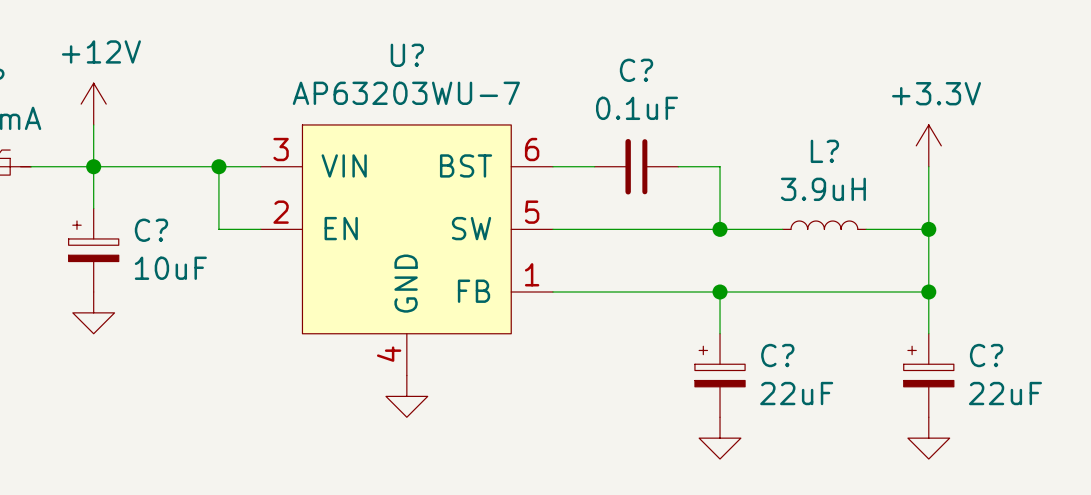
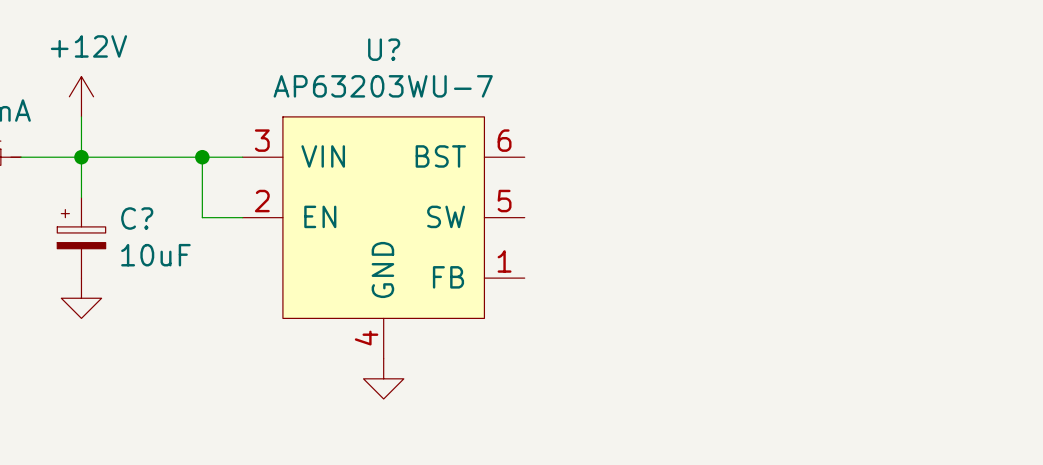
power symbol: +3.3V (928, 145) -> none
wire: (552, 166) (594, 166) -> none
C?: 0.1uF (636, 166) -> none
wire: (678, 166) (720, 166) (720, 229) -> none
wire: (928, 166) (928, 333) -> none
L?: 3.9uH (824, 225) -> none
wire: (552, 229) (782, 229) -> none
junction: (720, 229) -> none
wire: (866, 229) (928, 229) -> none
junction: (928, 229) -> none
wire: (552, 292) (928, 292) -> none
wire: (720, 292) (720, 333) -> none
junction: (720, 292) -> none
junction: (928, 292) -> none
C?: 22uF (720, 375) -> none
C?: 22uF (928, 375) -> none
power symbol: (720, 438) -> none
power symbol: (928, 438) -> none

